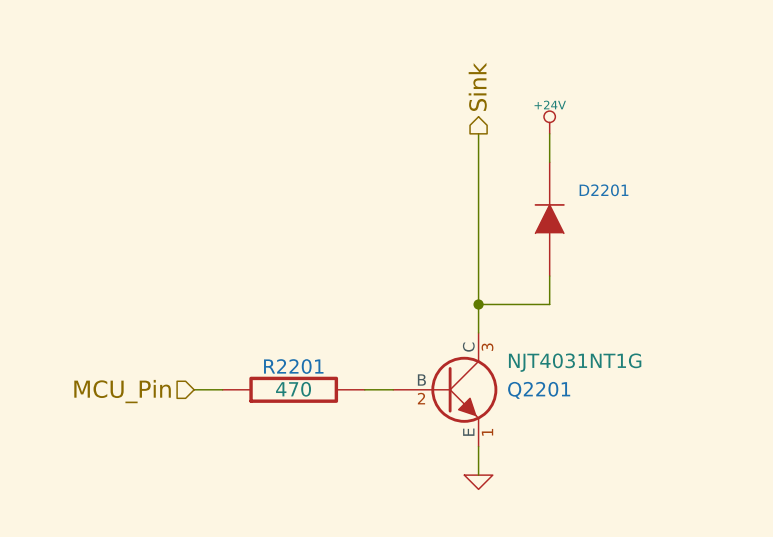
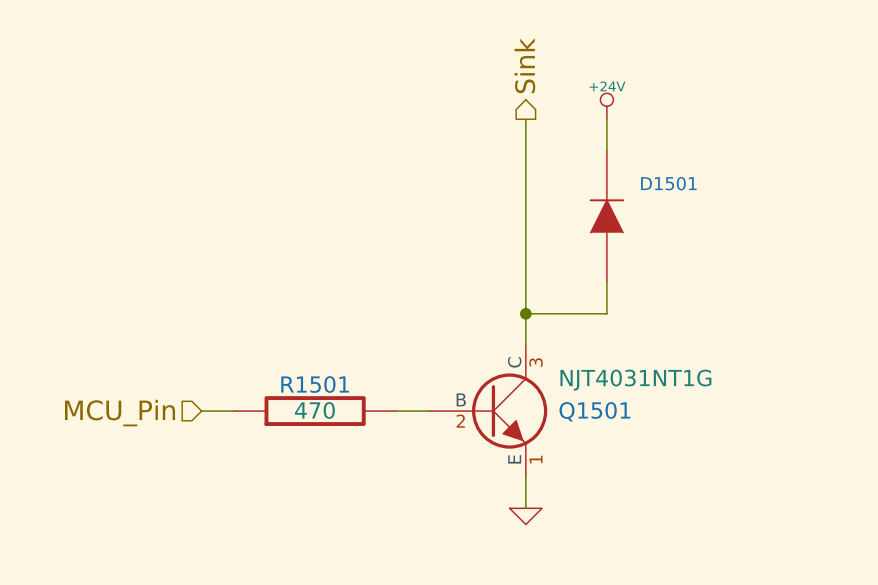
D2201 name: D2201 (604, 190) -> D1501 (668, 183)
R2201 name: R2201 (293, 366) -> R1501 (315, 384)
Q2201 name: Q2201 (539, 390) -> Q1501 (594, 411)

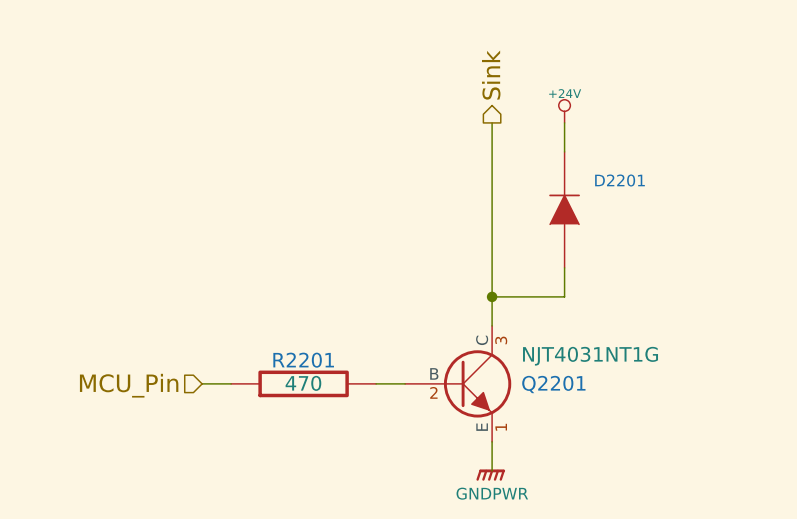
D1501 name: D1501 (668, 183) -> D2201 (619, 180)
R1501 name: R1501 (315, 384) -> R2201 (303, 360)
Q1501 name: Q1501 (594, 411) -> Q2201 (553, 384)
power symbol shape: [509, 508, 543, 525] -> [476, 469, 506, 481]
power symbol text: none -> GNDPWR (492, 493)

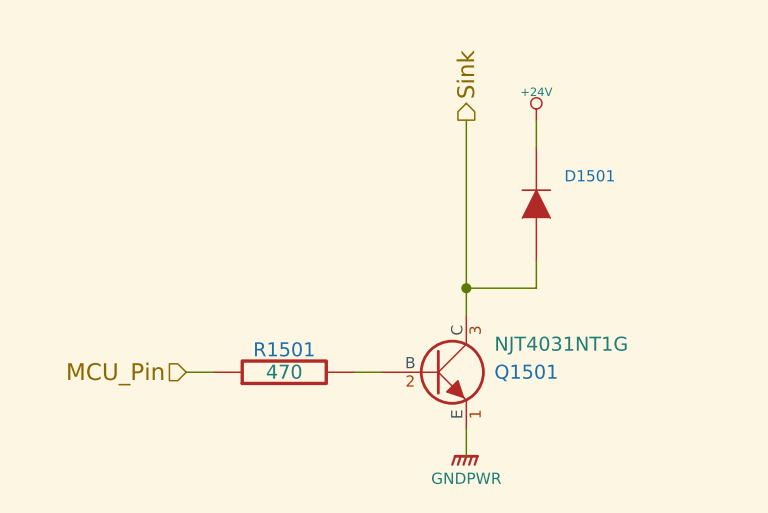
D2201 name: D2201 (619, 180) -> D1501 (589, 175)
R2201 name: R2201 (303, 360) -> R1501 (284, 349)
Q2201 name: Q2201 (553, 384) -> Q1501 (525, 372)

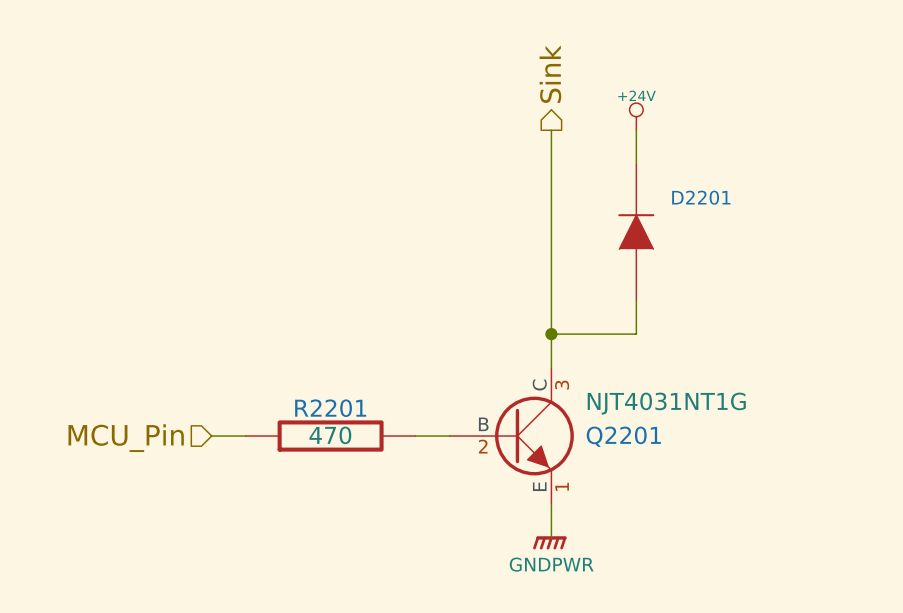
D1501 name: D1501 (589, 175) -> D2201 (701, 197)
R1501 name: R1501 (284, 349) -> R2201 (330, 408)
Q1501 name: Q1501 (525, 372) -> Q2201 (623, 436)

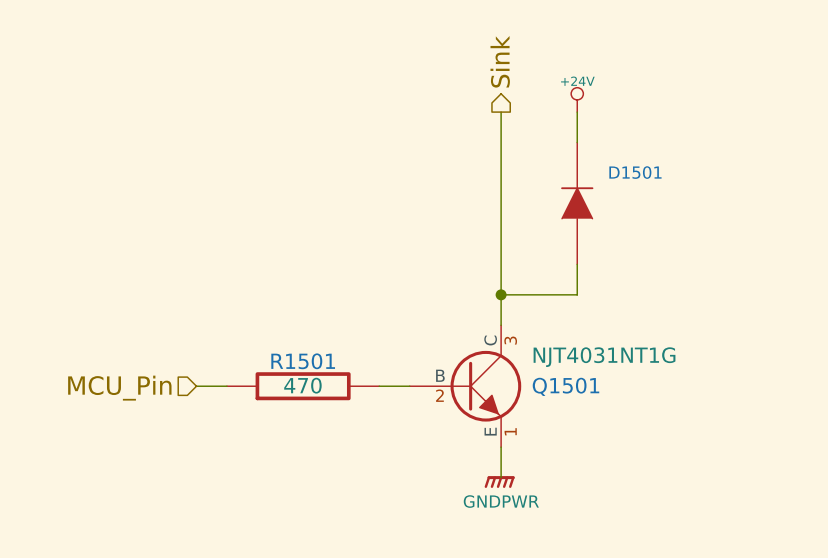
D2201 name: D2201 (701, 197) -> D1501 (635, 172)
R2201 name: R2201 (330, 408) -> R1501 (303, 361)
Q2201 name: Q2201 (623, 436) -> Q1501 (565, 386)

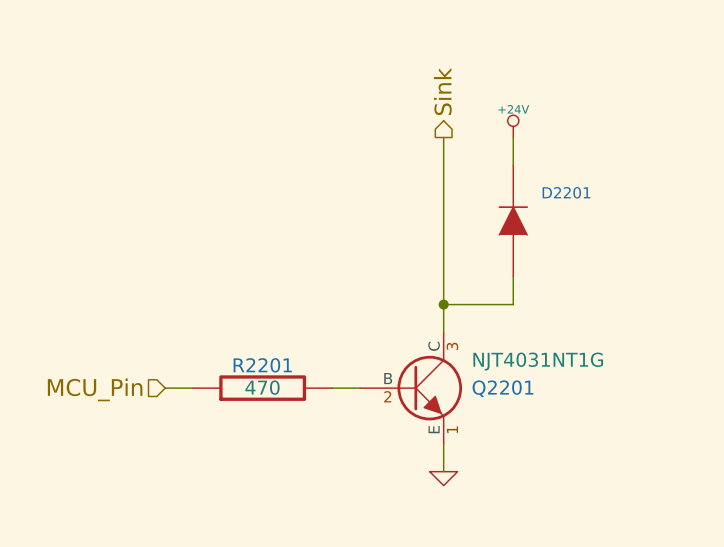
D1501 name: D1501 (635, 172) -> D2201 (566, 192)
R1501 name: R1501 (303, 361) -> R2201 (262, 365)
Q1501 name: Q1501 (565, 386) -> Q2201 (502, 388)
power symbol shape: [484, 476, 515, 488] -> [429, 471, 458, 486]
power symbol text: GNDPWR (501, 501) -> none

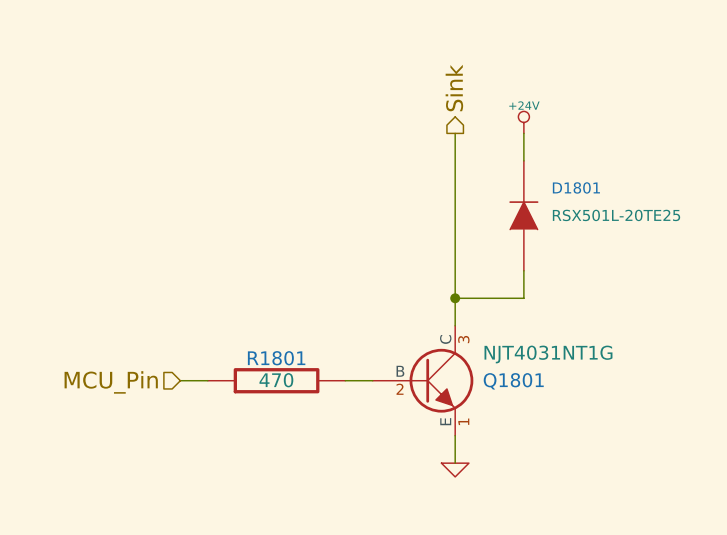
D2201 name: D2201 (566, 192) -> D1801 (576, 187)
D2201 value: none -> RSX501L-20TE25 (616, 215)
R2201 name: R2201 (262, 365) -> R1801 (276, 358)
Q2201 name: Q2201 (502, 388) -> Q1801 (513, 381)

